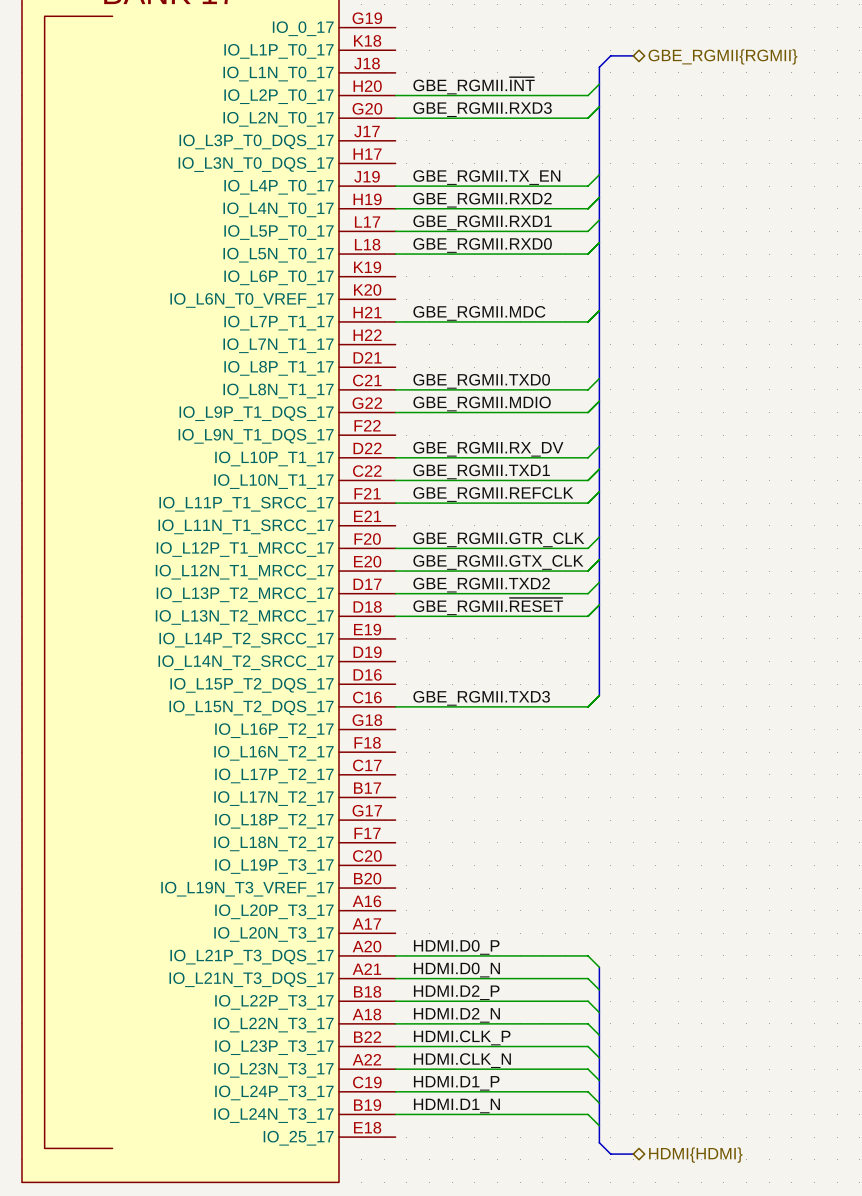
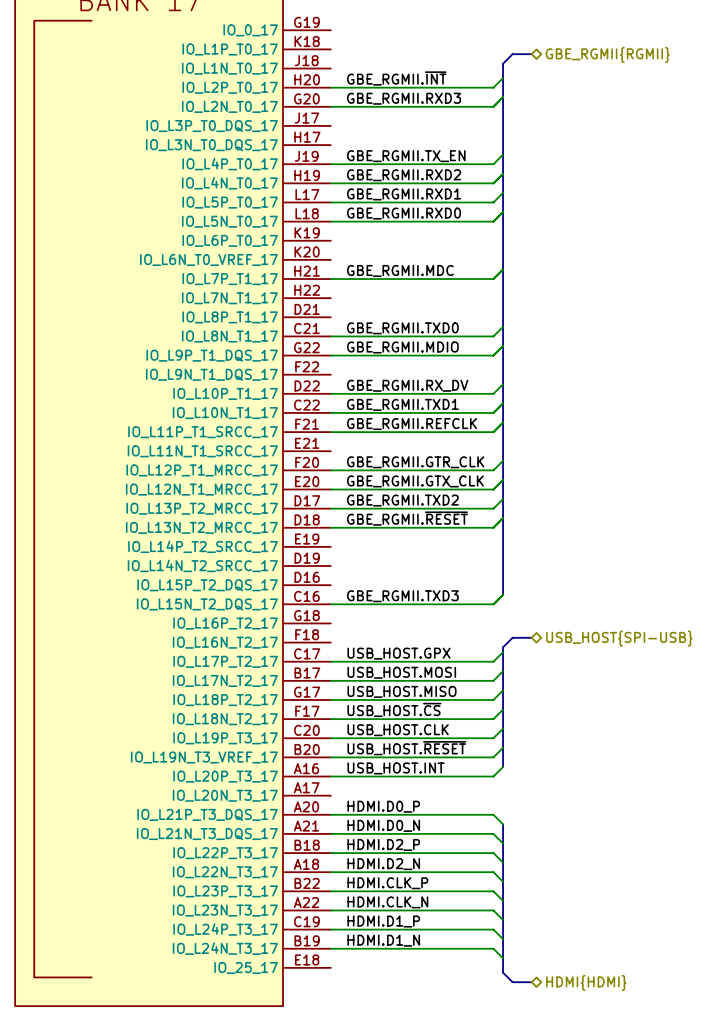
bus: none -> (531, 637) (512, 637) (503, 647) (503, 766)
hierarchical label: none -> USB_HOST{SPI-USB} (619, 638)
wire: none -> (503, 652) (493, 661) (330, 661)
label: none -> USB_HOST.GPX (399, 653)
wire: none -> (503, 671) (493, 680) (330, 680)
label: none -> USB_HOST.MOSI (401, 672)
wire: none -> (503, 690) (493, 699) (330, 699)
label: none -> USB_HOST.MISO (401, 691)
wire: none -> (503, 709) (493, 719) (330, 719)
label: none -> USB_HOST.~{CS} (394, 709)
wire: none -> (503, 728) (493, 738) (330, 738)
label: none -> USB_HOST.CLK (398, 730)
wire: none -> (503, 747) (493, 757) (330, 757)
label: none -> USB_HOST.~{RESET} (406, 748)
wire: none -> (503, 766) (493, 776) (330, 776)
label: none -> USB_HOST.INT (396, 768)

